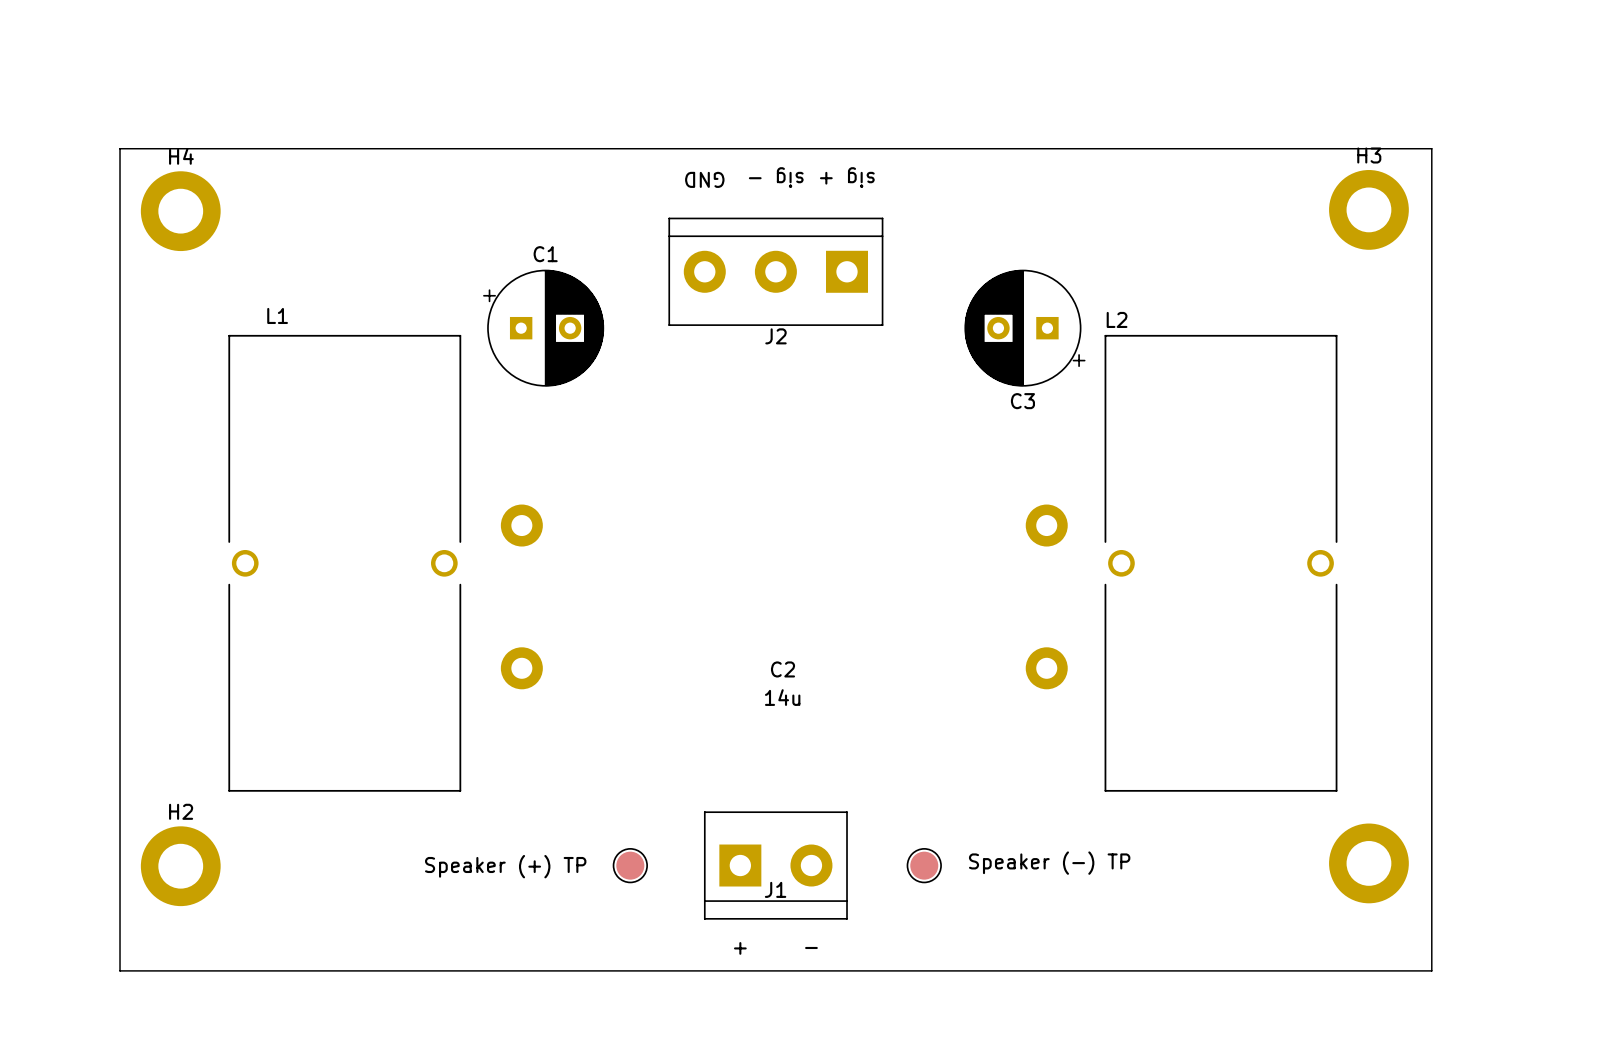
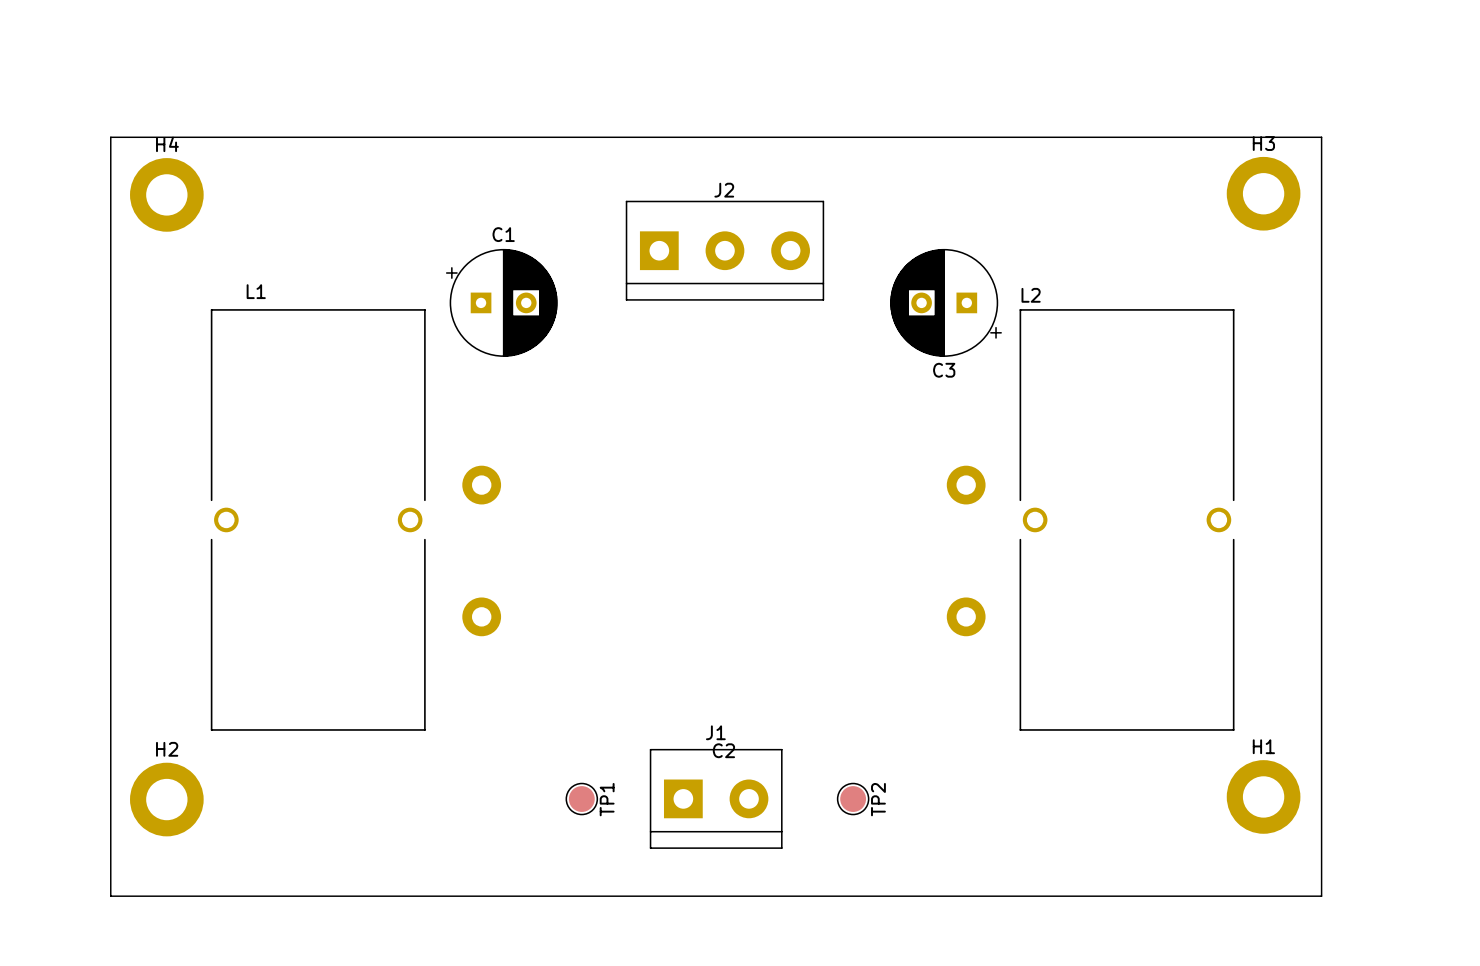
text: sig - (776, 177) -> none
text: sig + (847, 177) -> none
text: GND (704, 179) -> none
J2 rotation: 0° (775, 271) -> 180° (724, 250)
C2 name position: C2 (783, 669) -> C2 (723, 750)
C2 value: 14u (782, 697) -> none
H1 name: none -> H1 (1263, 746)
Speaker (-) TP name: Speaker (-) TP (1049, 863) -> TP2 (878, 799)
Speaker (+) TP name: Speaker (+) TP (505, 866) -> TP1 (607, 799)
J1 name position: J1 (775, 889) -> J1 (715, 732)
text: _ (811, 947) -> none
text: + (740, 948) -> none

